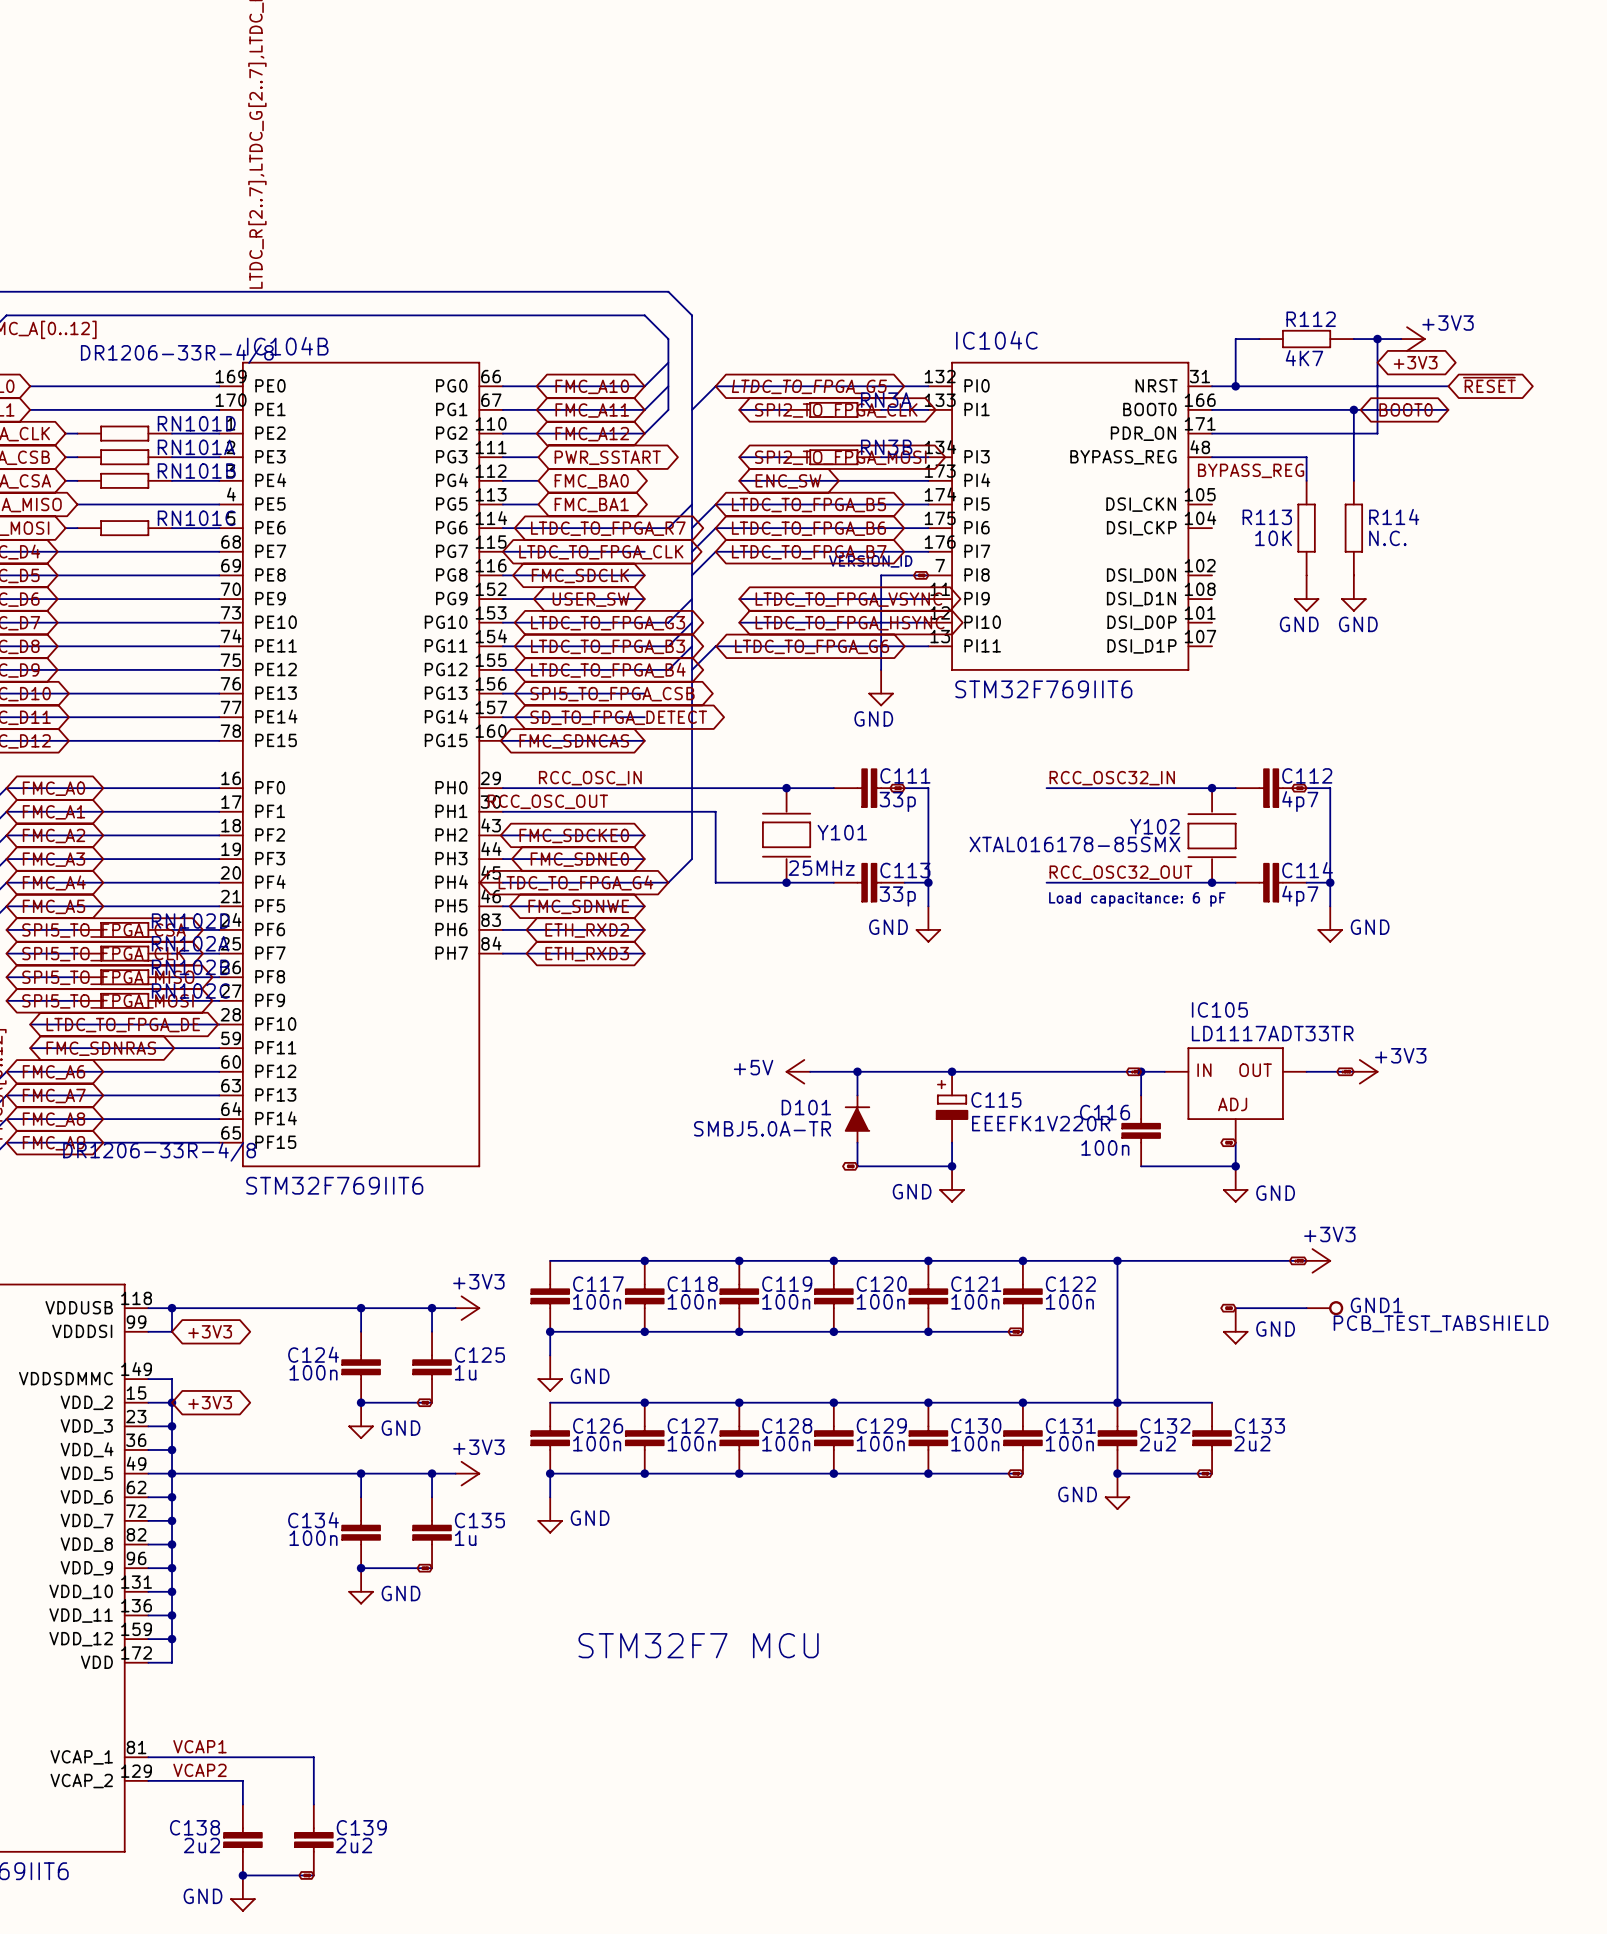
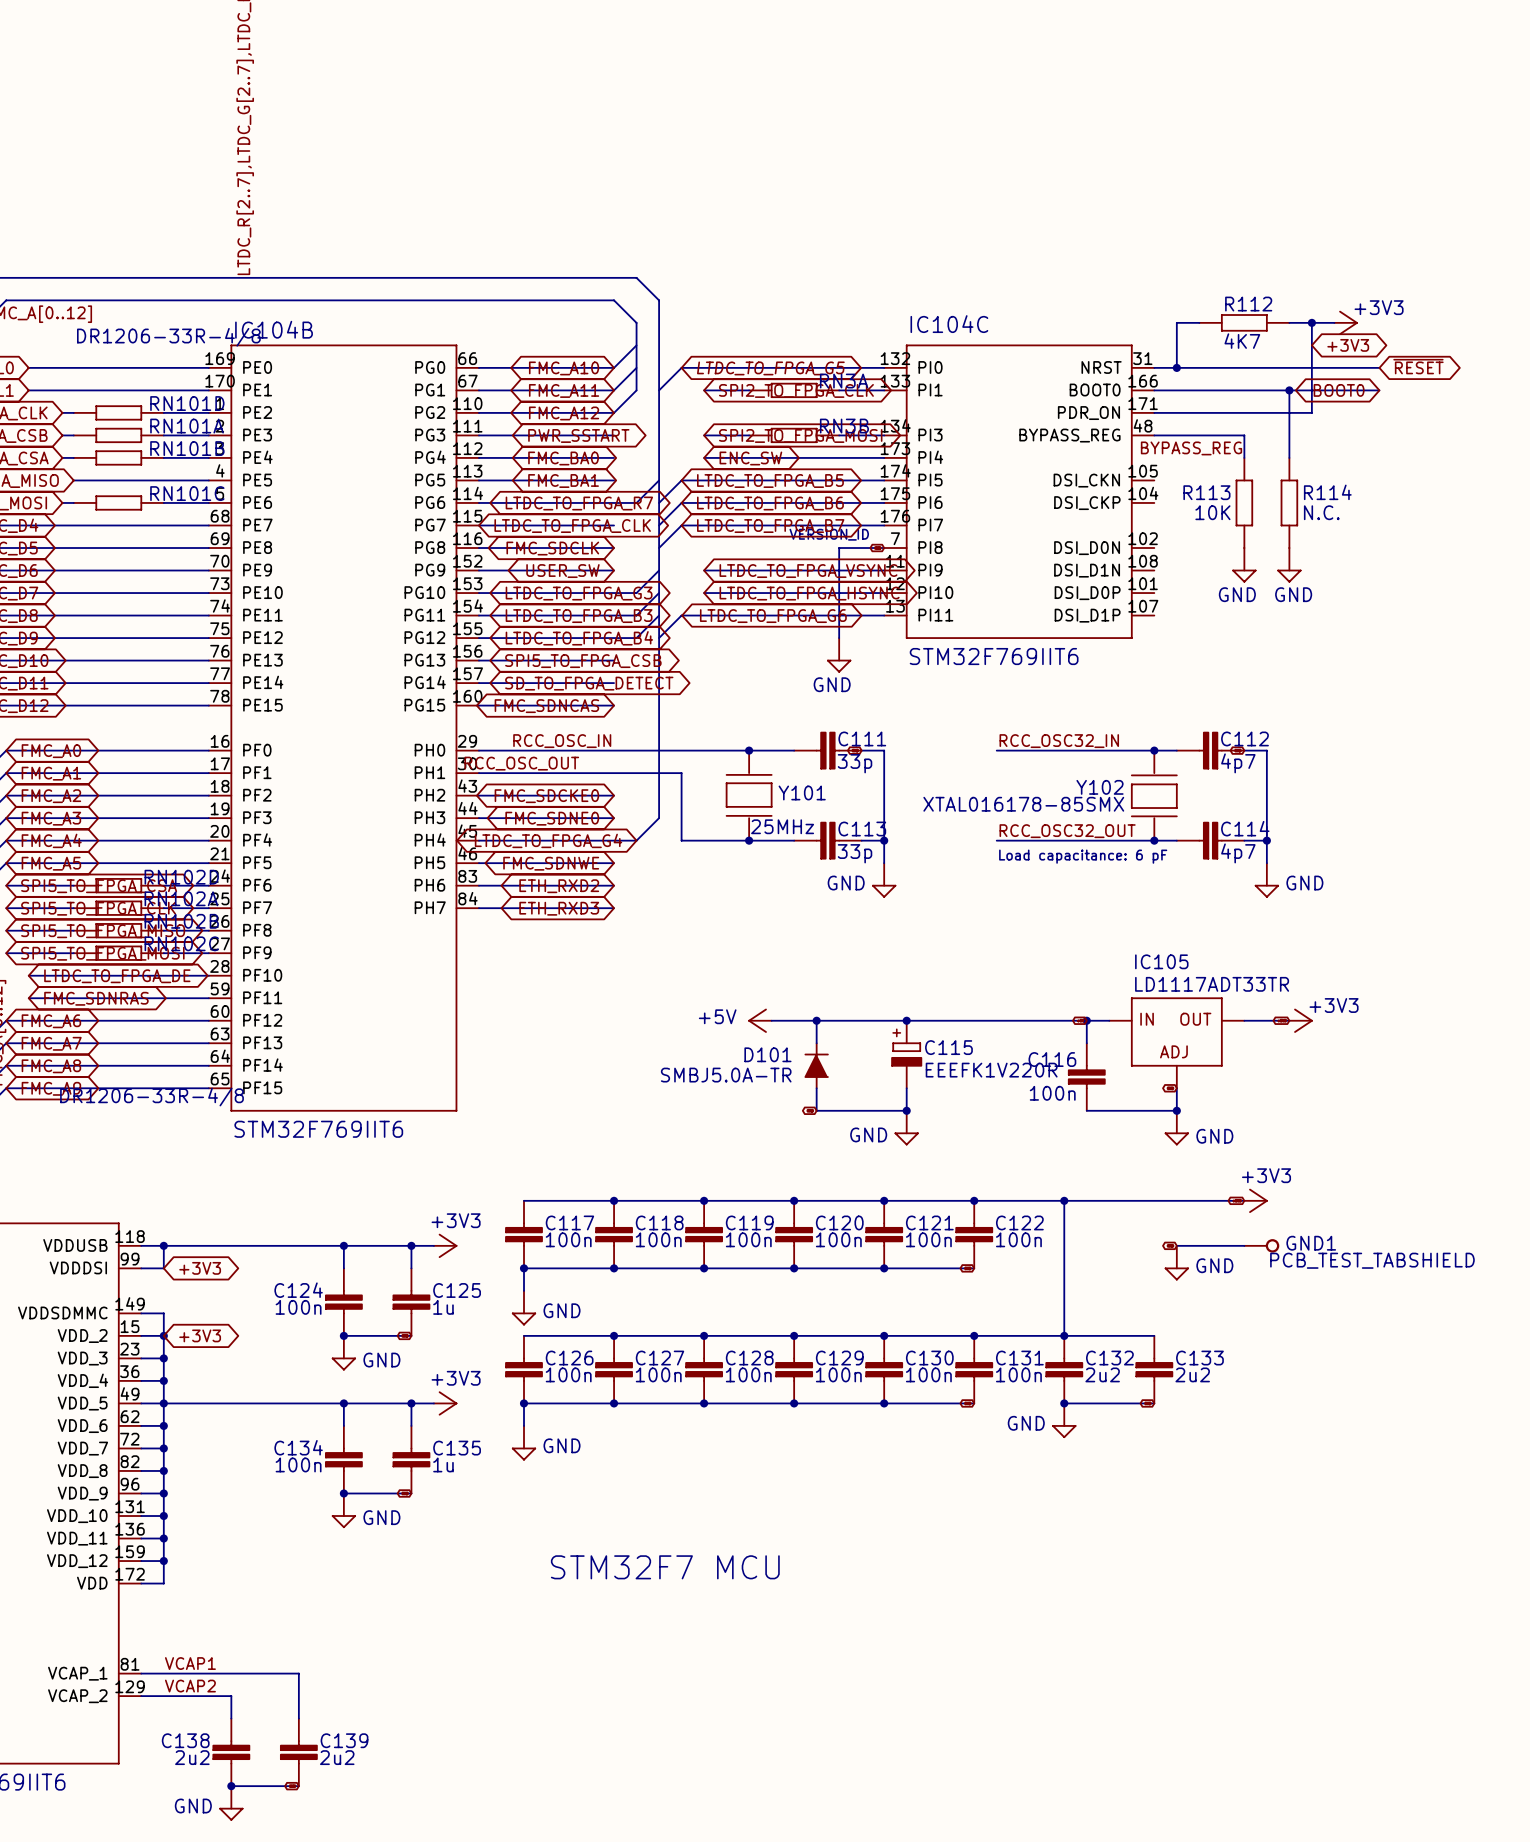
wire: none -> (512, 435) (614, 435)
wire: none -> (512, 457) (614, 457)
wire: none -> (512, 480) (614, 480)

